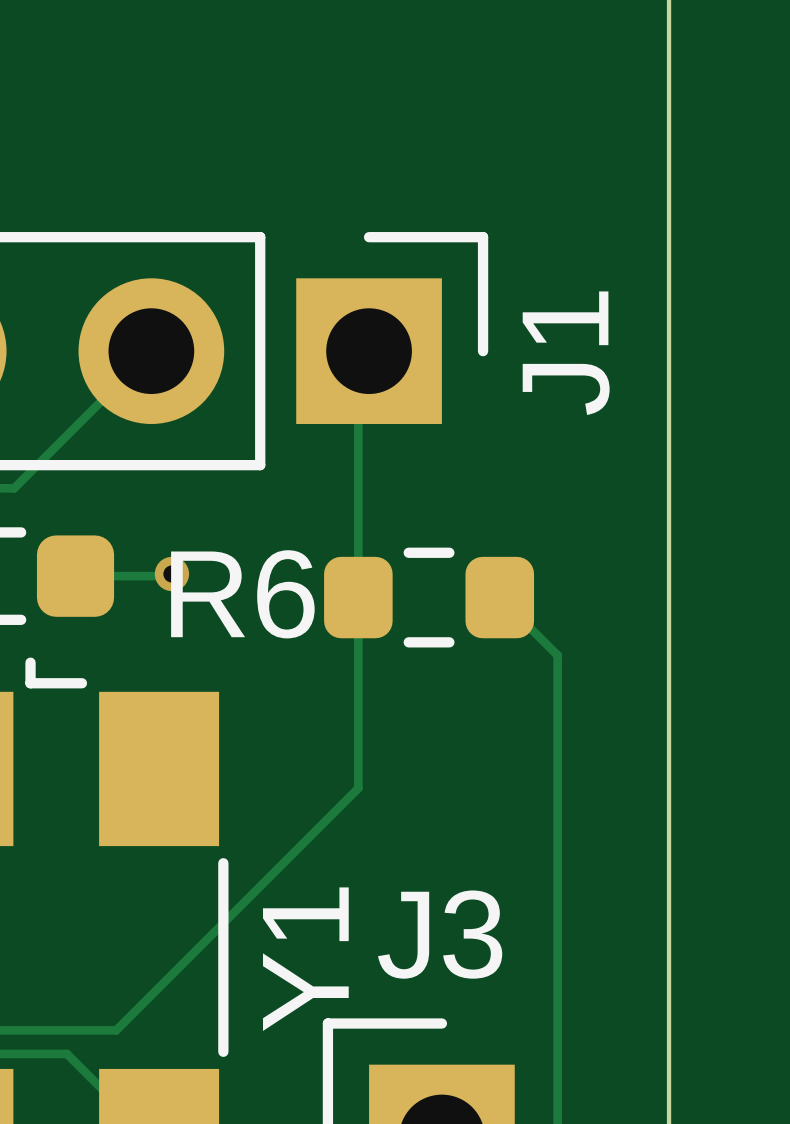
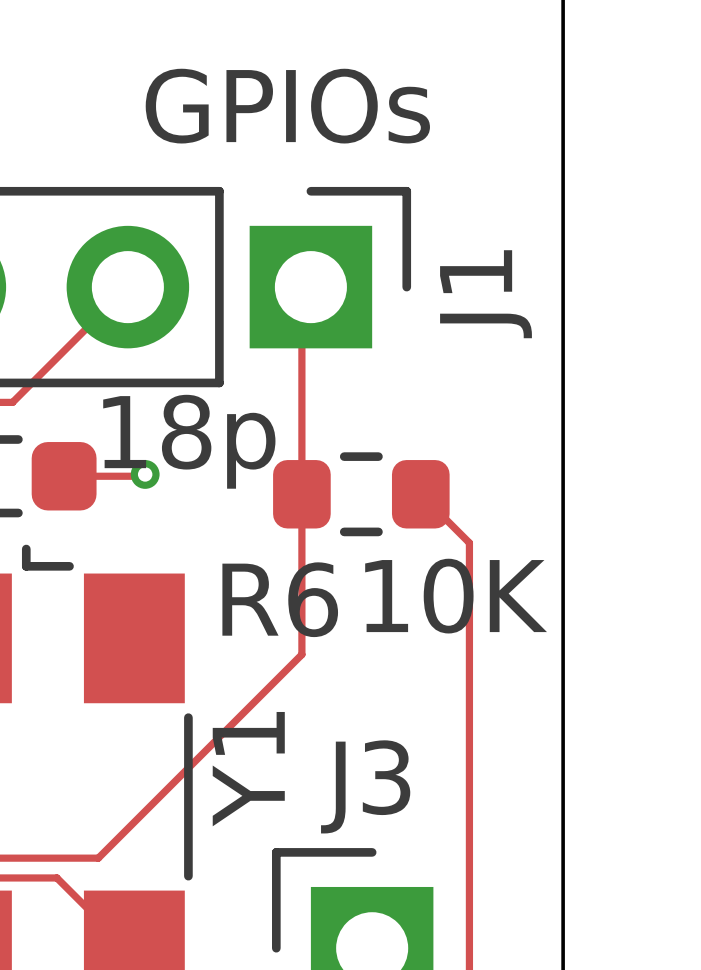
J1 value: none -> GPIOs (287, 106)
part value: none -> 18p (189, 441)
R6 name position: R6 (242, 594) -> R6 (280, 599)
R6 value: none -> 10K (456, 596)
Y1 name position: Y1 (305, 959) -> Y1 (248, 769)

